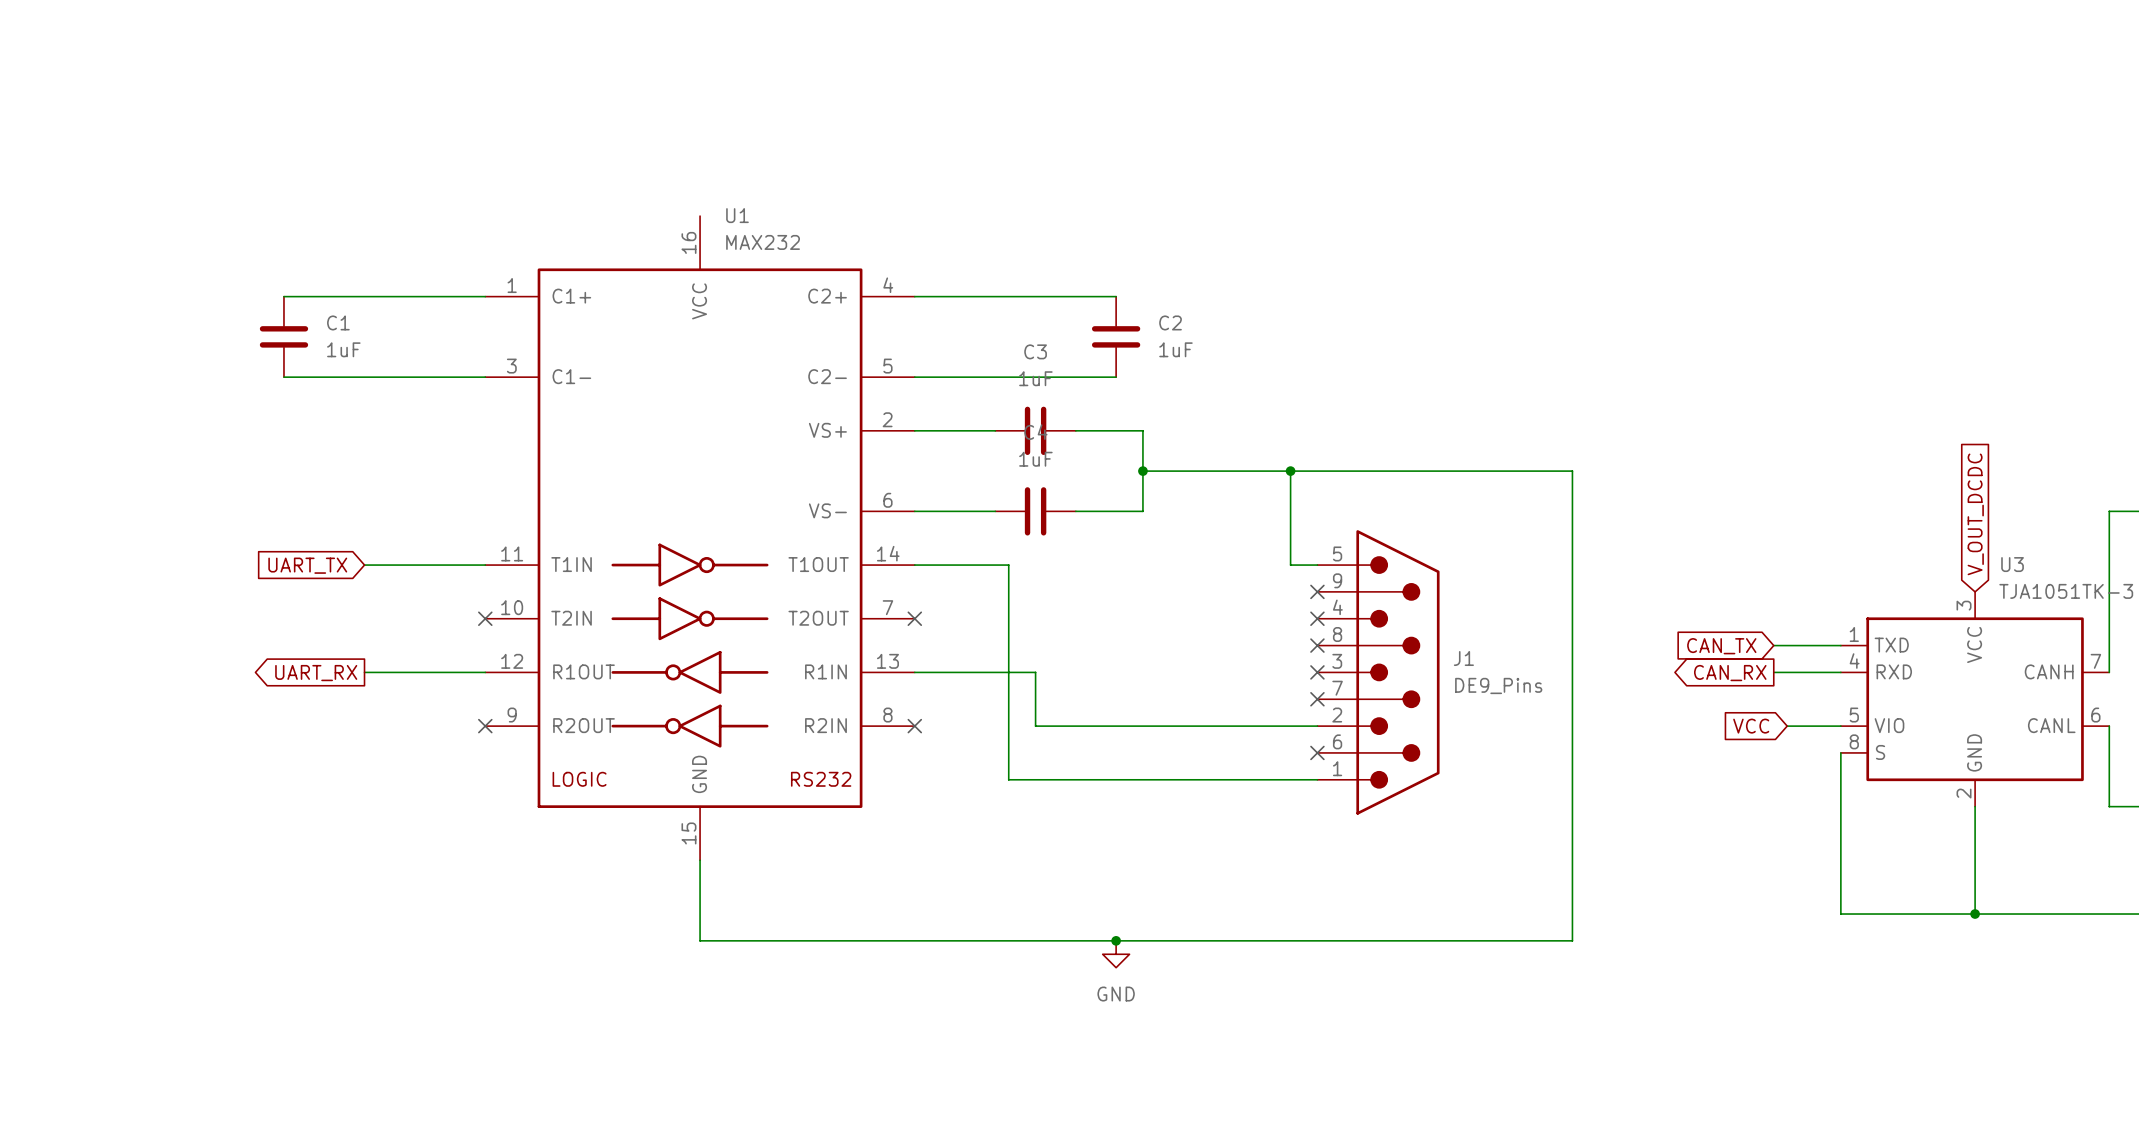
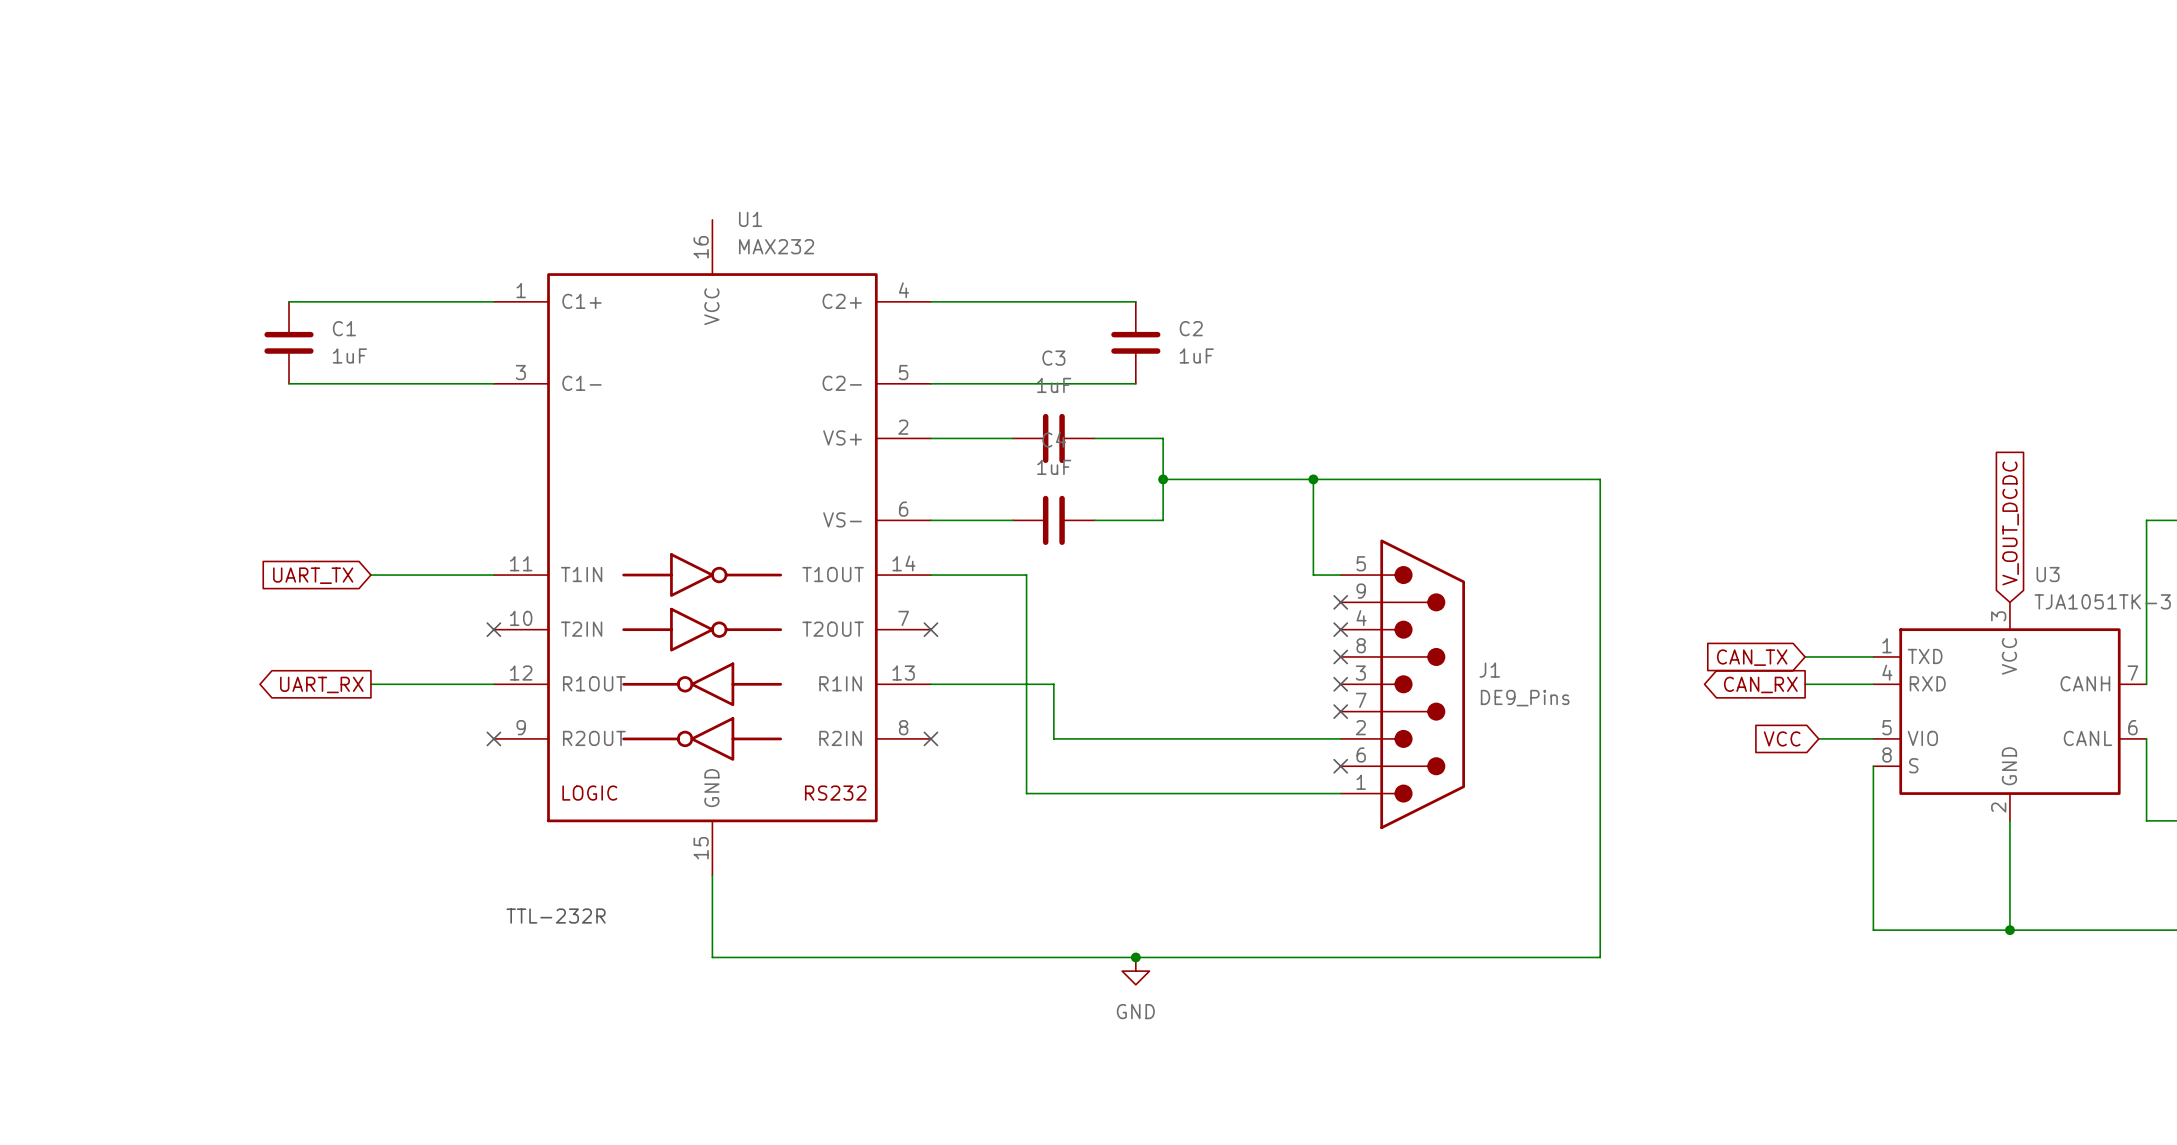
text: none -> TTL-232R (556, 916)

